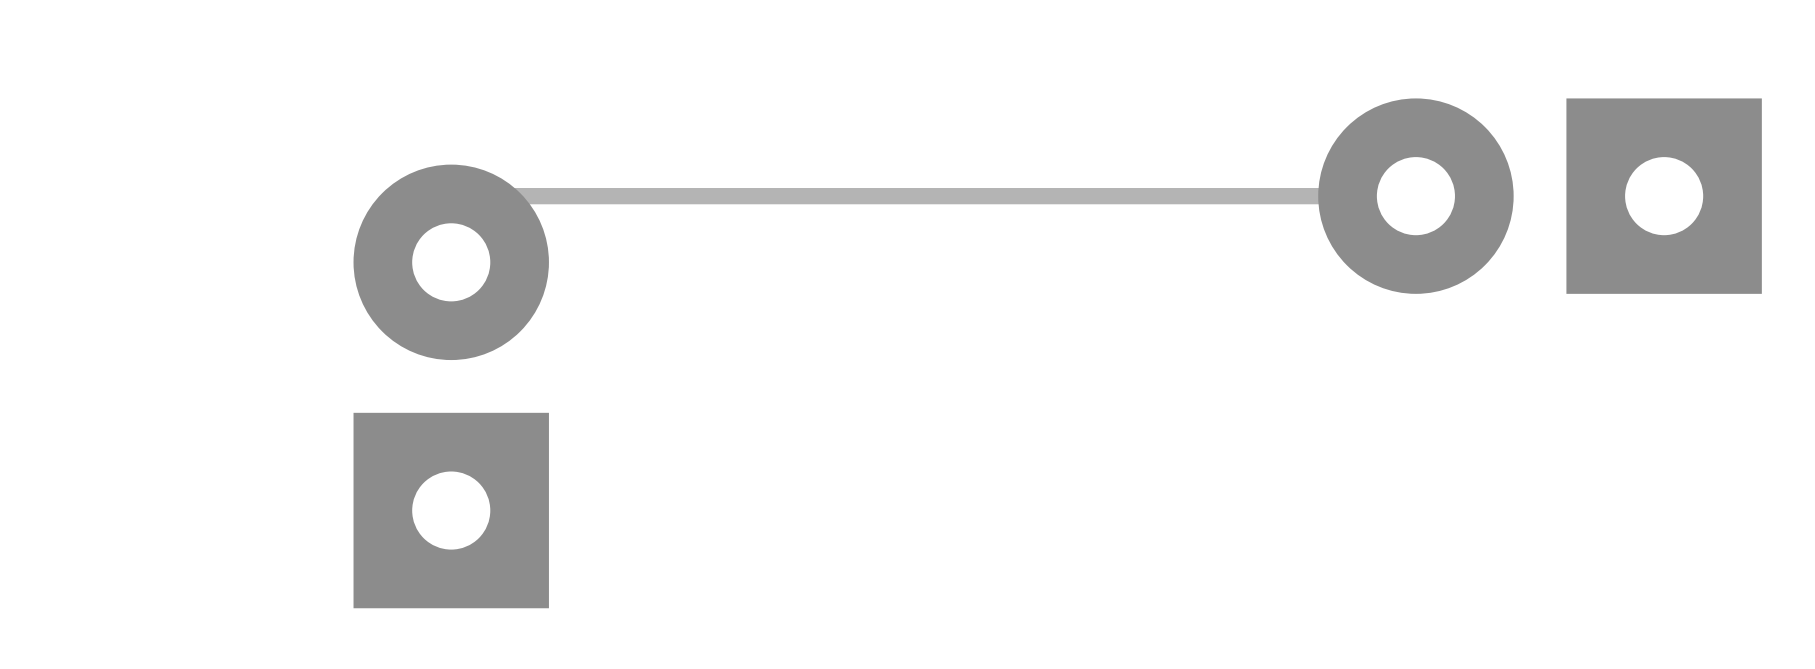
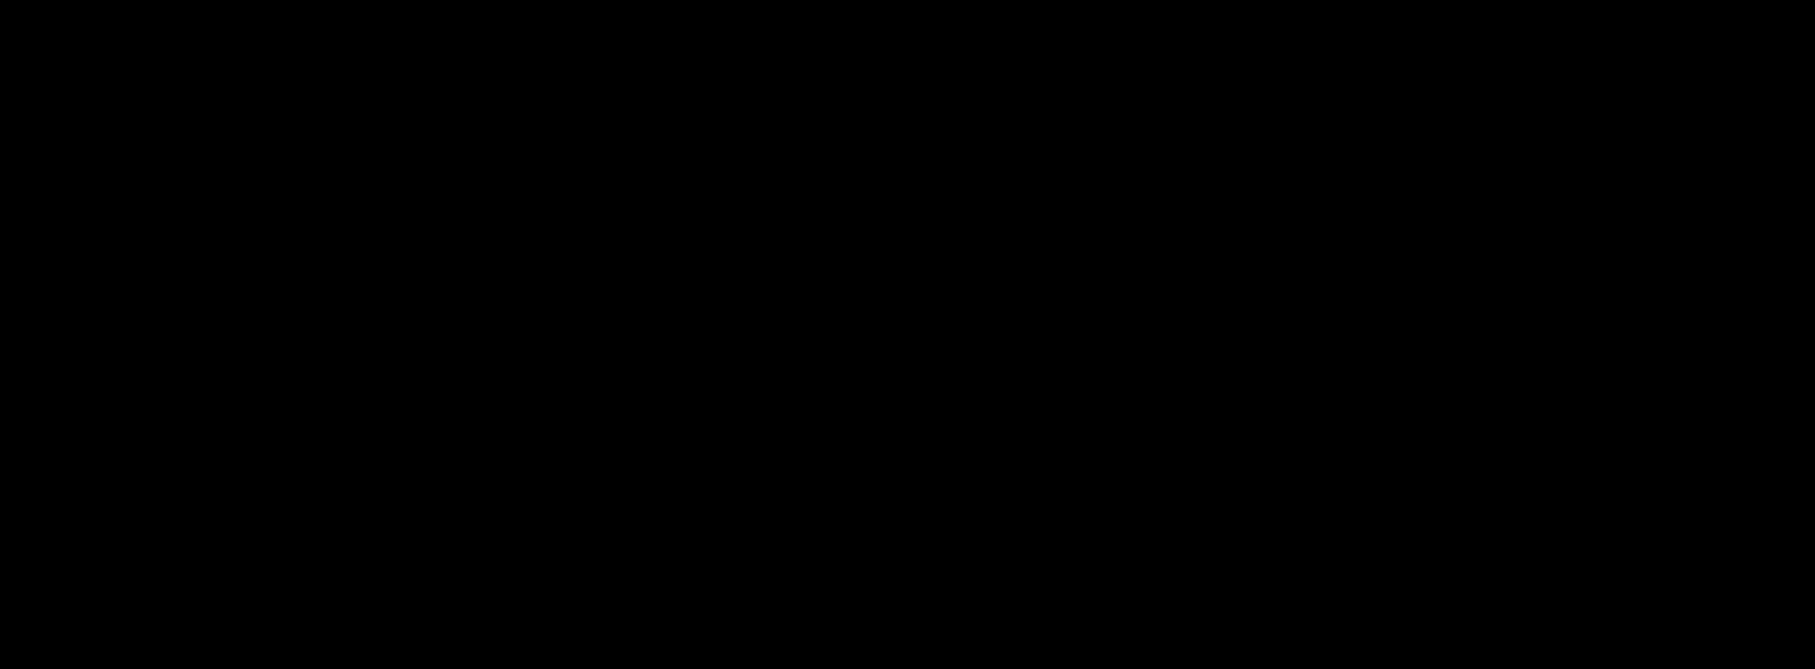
track: (1415, 196) (517, 196) (451, 262) -> none
part: (1540, 196) -> none
part: (451, 386) -> none

